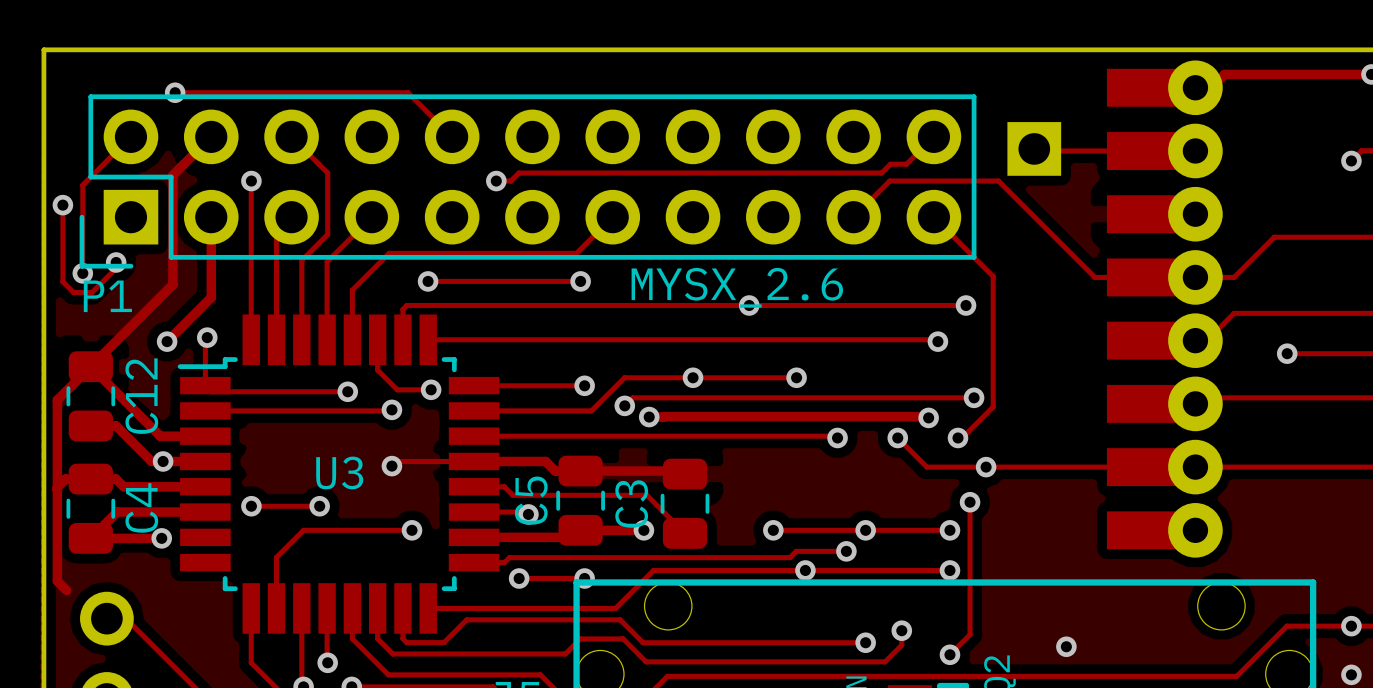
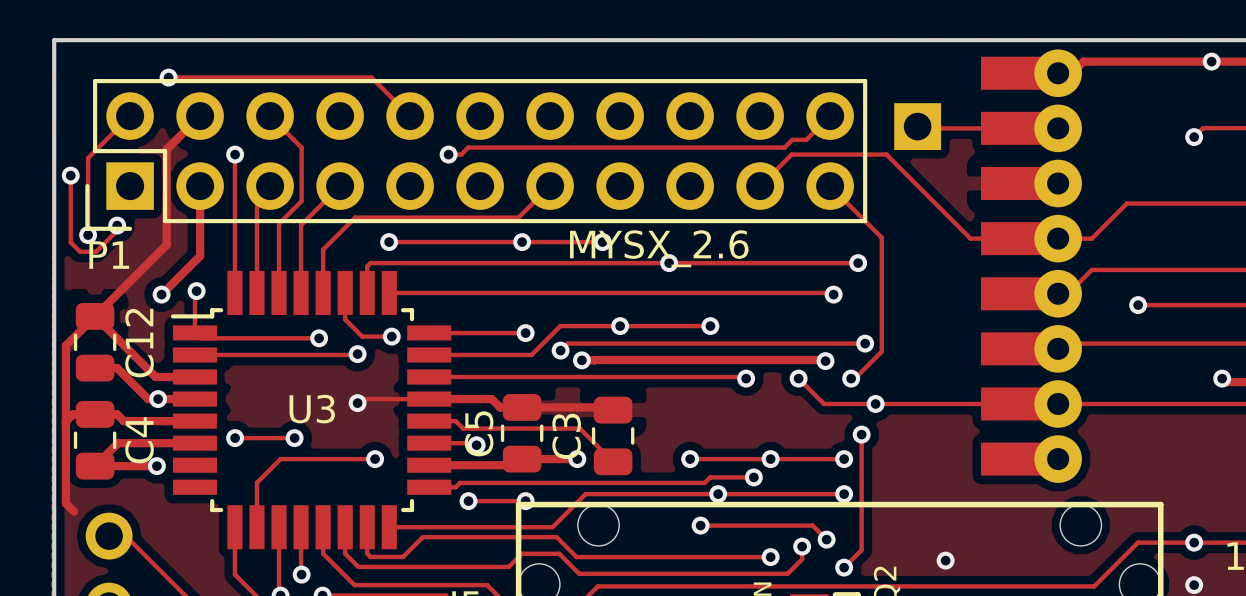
track: none -> (522, 242) (602, 242)
via: none -> (602, 242)
track: none -> (700, 525) (812, 525) (826, 539)
via: none -> (700, 525)
via: none -> (826, 539)

